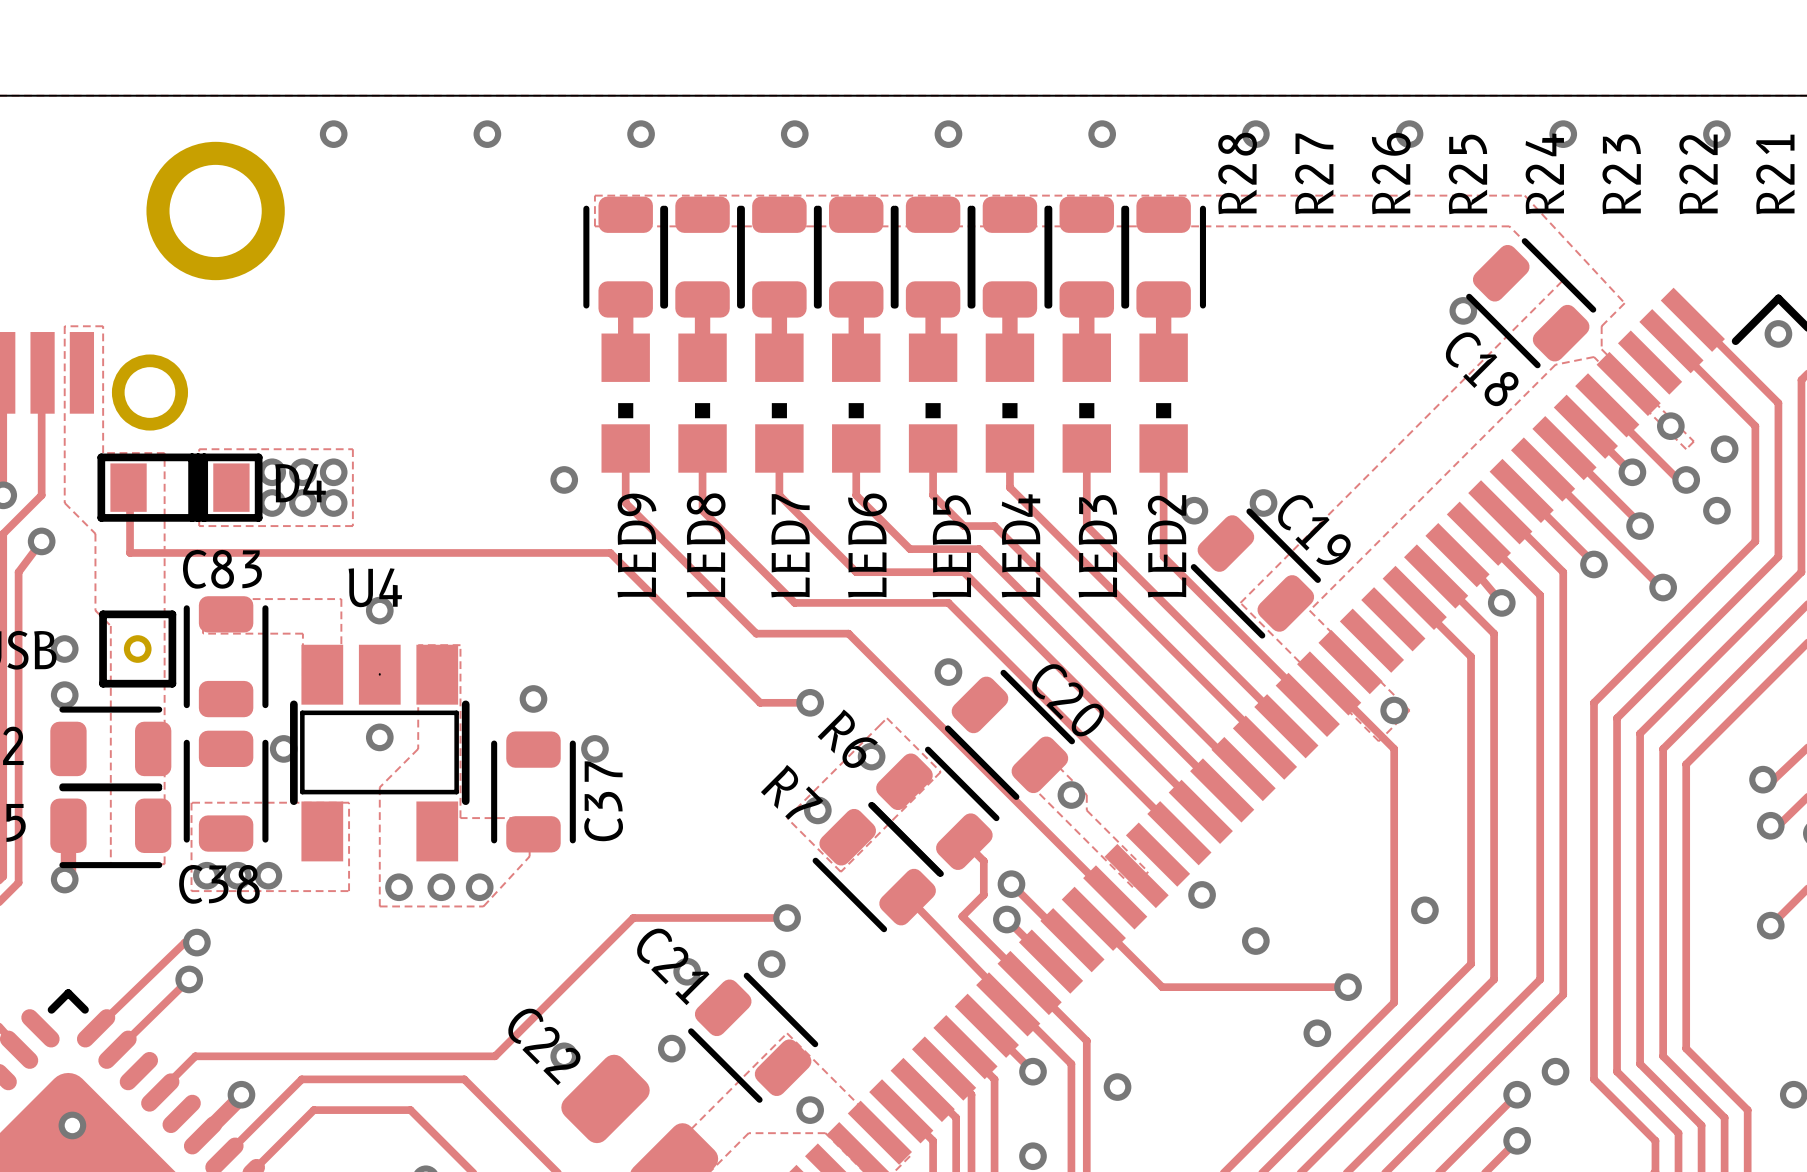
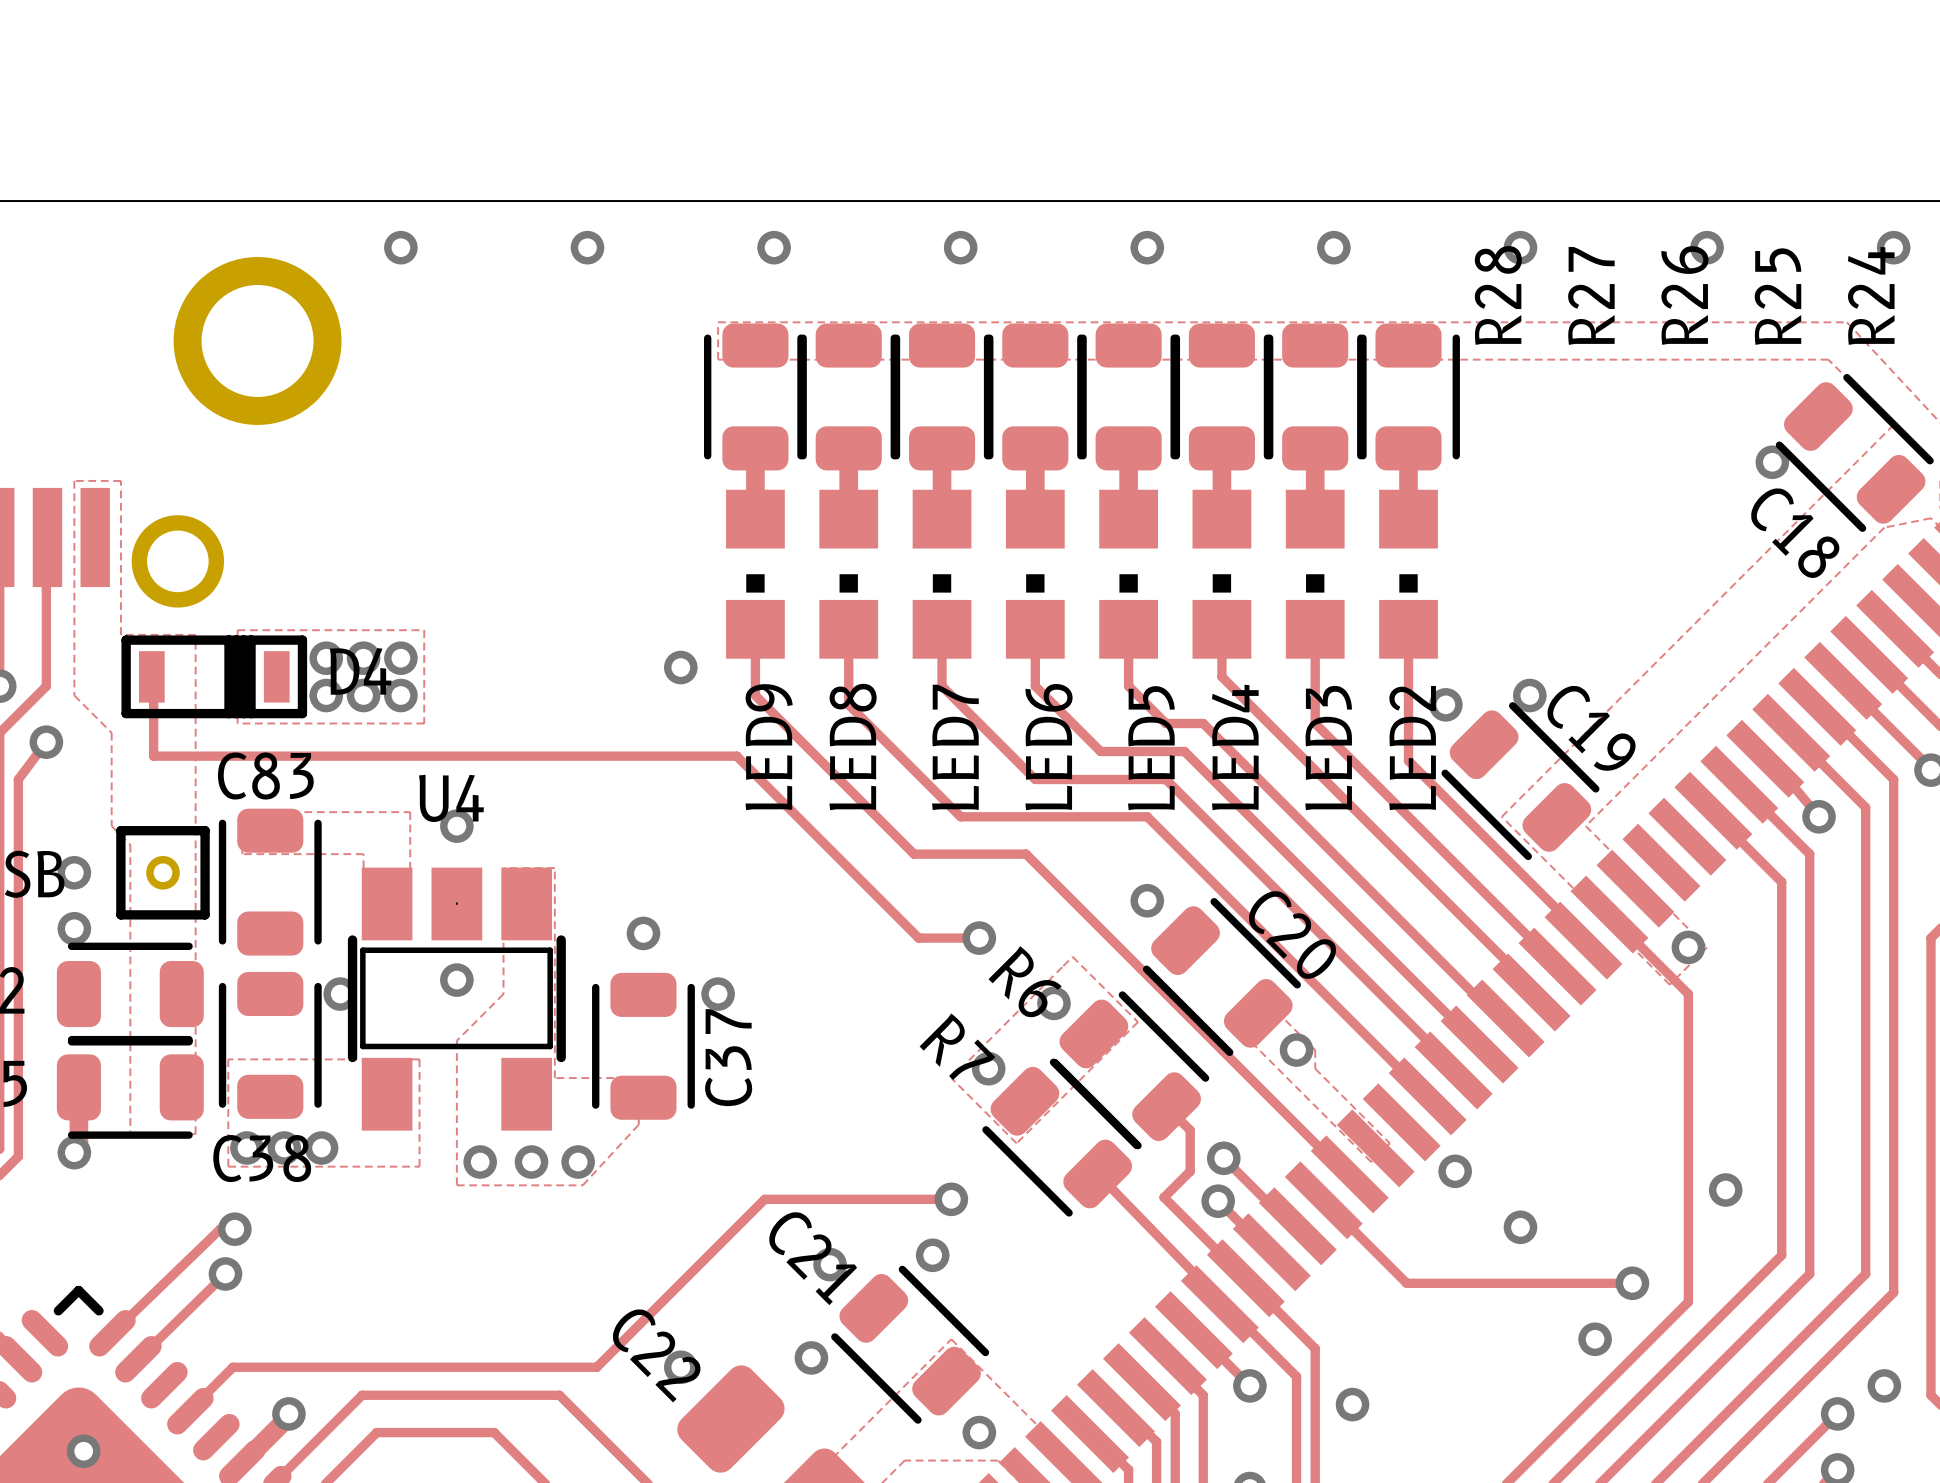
D4 footprint: [97, 453, 263, 522] -> [121, 635, 308, 719]

